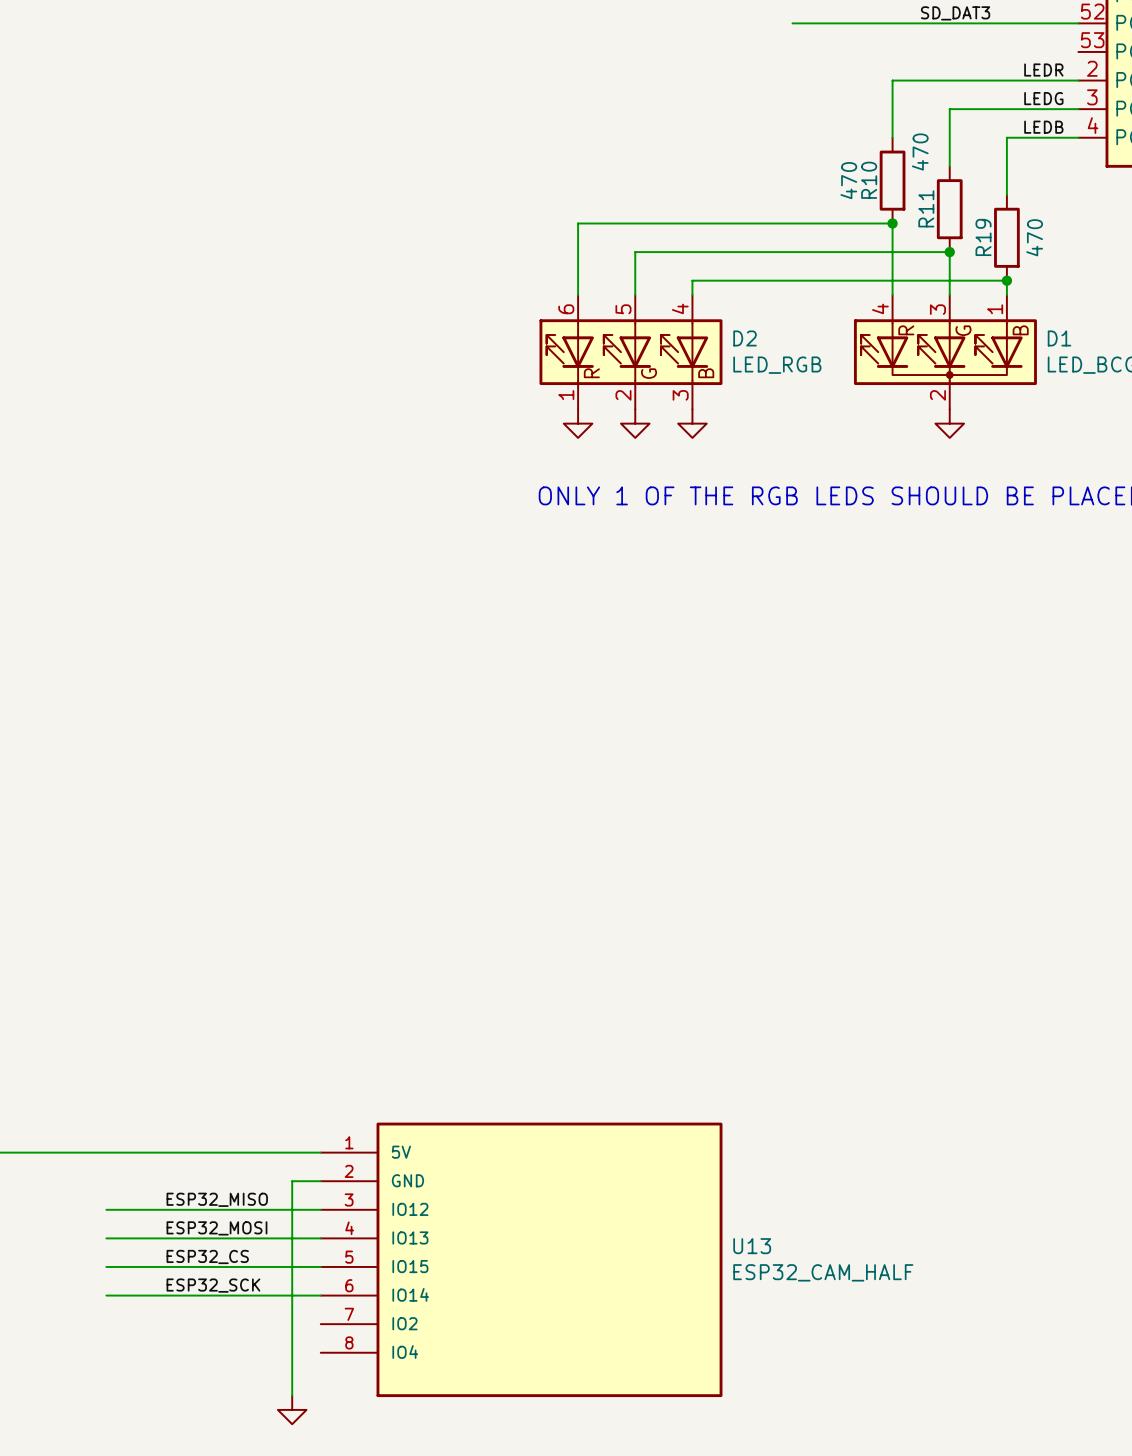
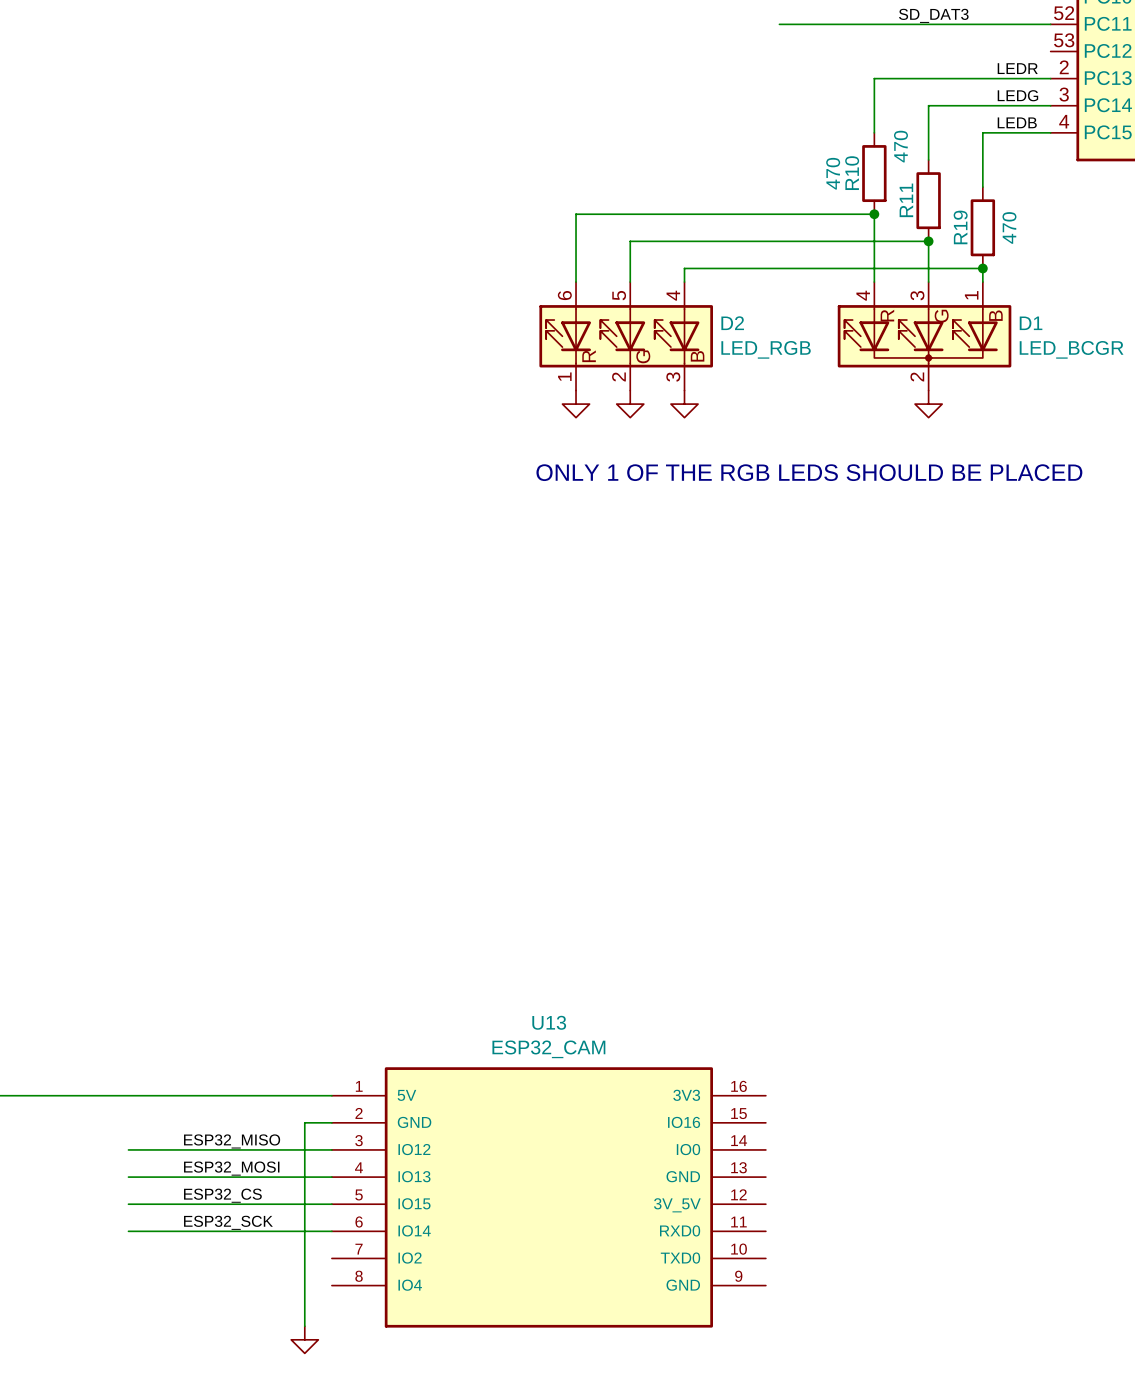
U13 symbol: [320, 1122, 723, 1398] -> [331, 1067, 766, 1328]
U13 name position: U13 (752, 1246) -> U13 (549, 1022)
U13 value: ESP32_CAM_HALF (823, 1272) -> ESP32_CAM (548, 1049)

